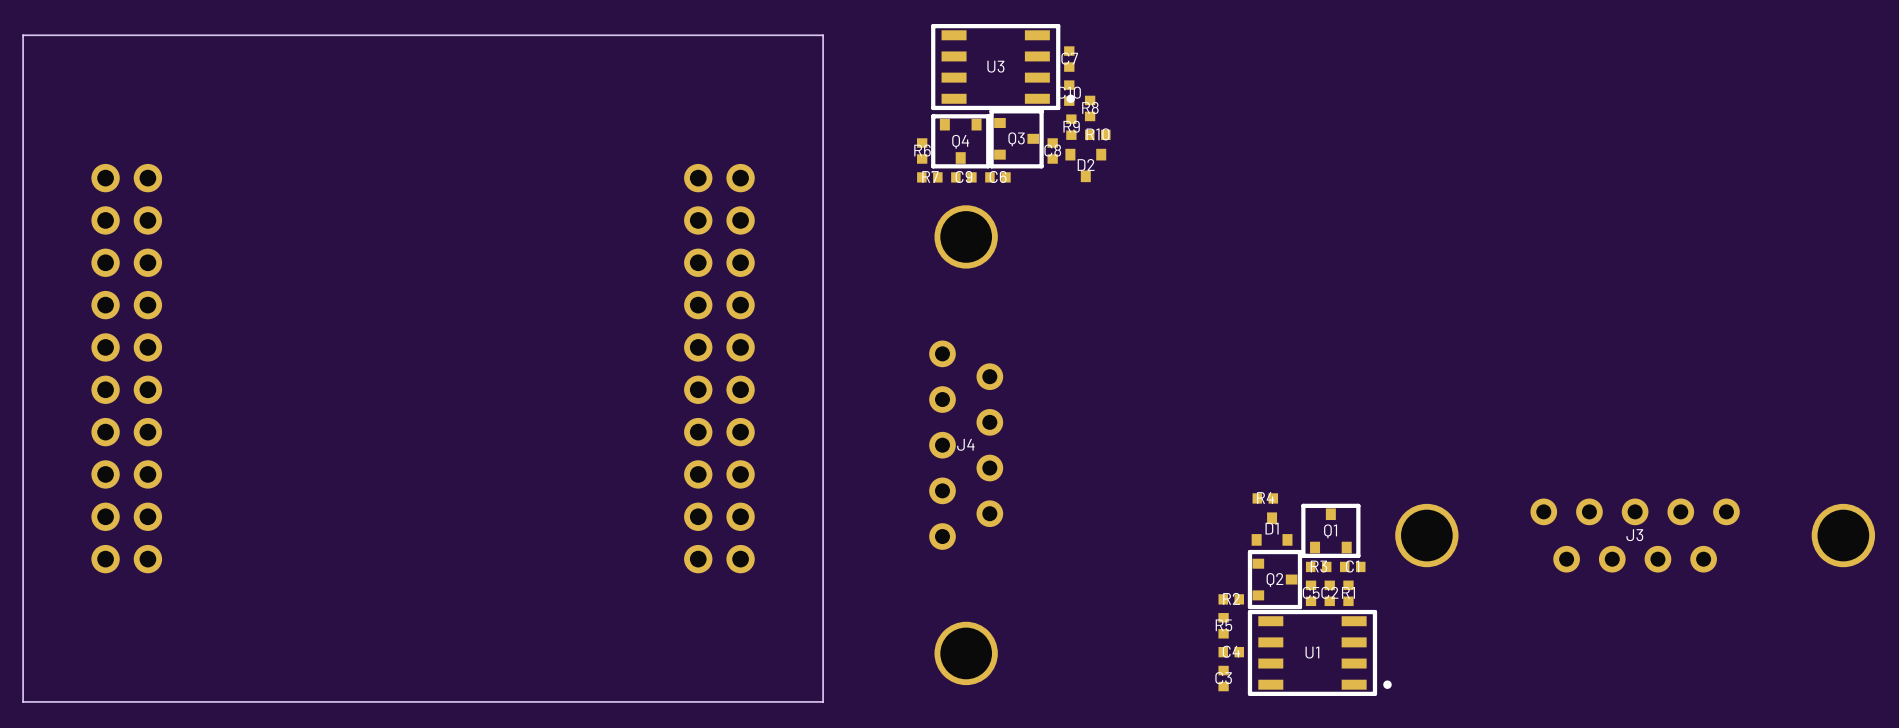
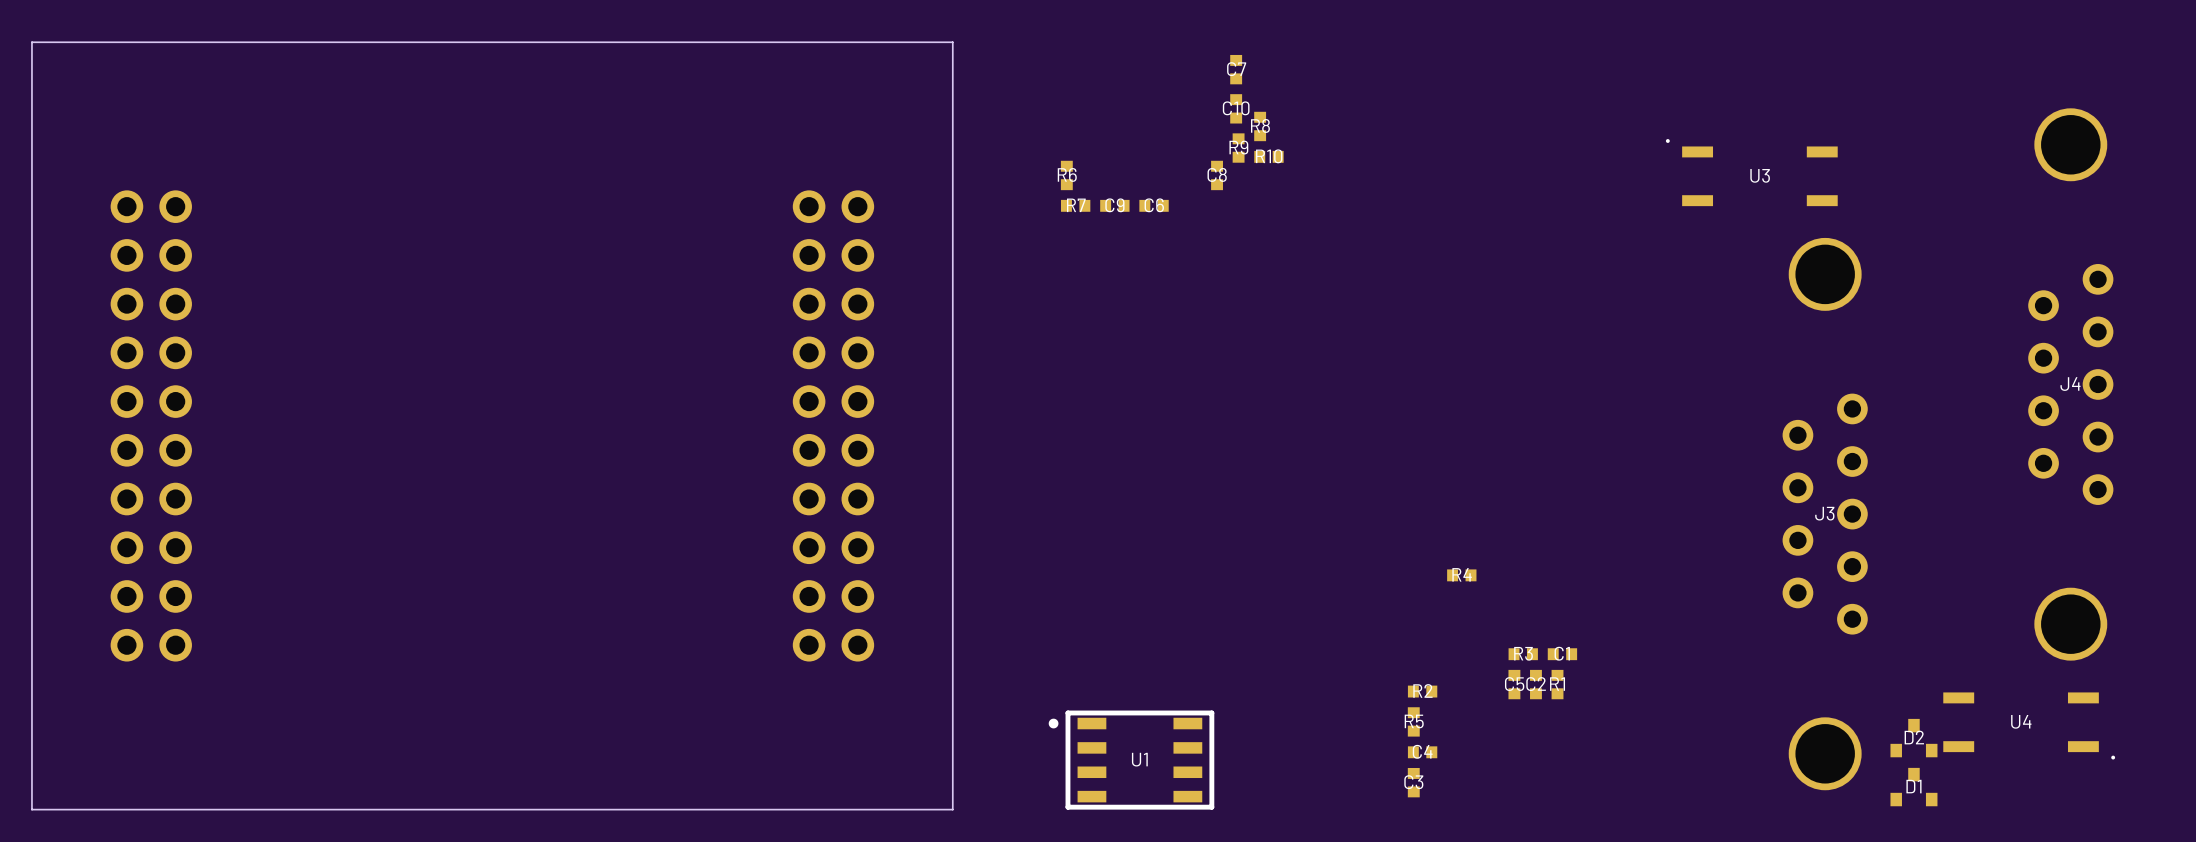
U3 footprint: [931, 23, 1075, 111] -> [1665, 139, 1838, 207]
Q3: (1016, 138) -> none
Q4: (960, 141) -> none
D2 rotation: 0° (1085, 165) -> 180° (1913, 738)
D2 position: (1085, 165) -> (1913, 738)
J4 rotation: 0° (966, 445) -> 180° (2070, 384)
J4 position: (966, 445) -> (2070, 384)
D1 position: (1272, 529) -> (1913, 787)
Q1: (1330, 530) -> none
J3 rotation: 0° (1635, 535) -> 90° clockwise (1825, 514)
Q2: (1274, 579) -> none
U4: none -> (2029, 725)
U1 rotation: 0° (1319, 652) -> 180° (1131, 760)
U1 position: (1319, 652) -> (1131, 760)

